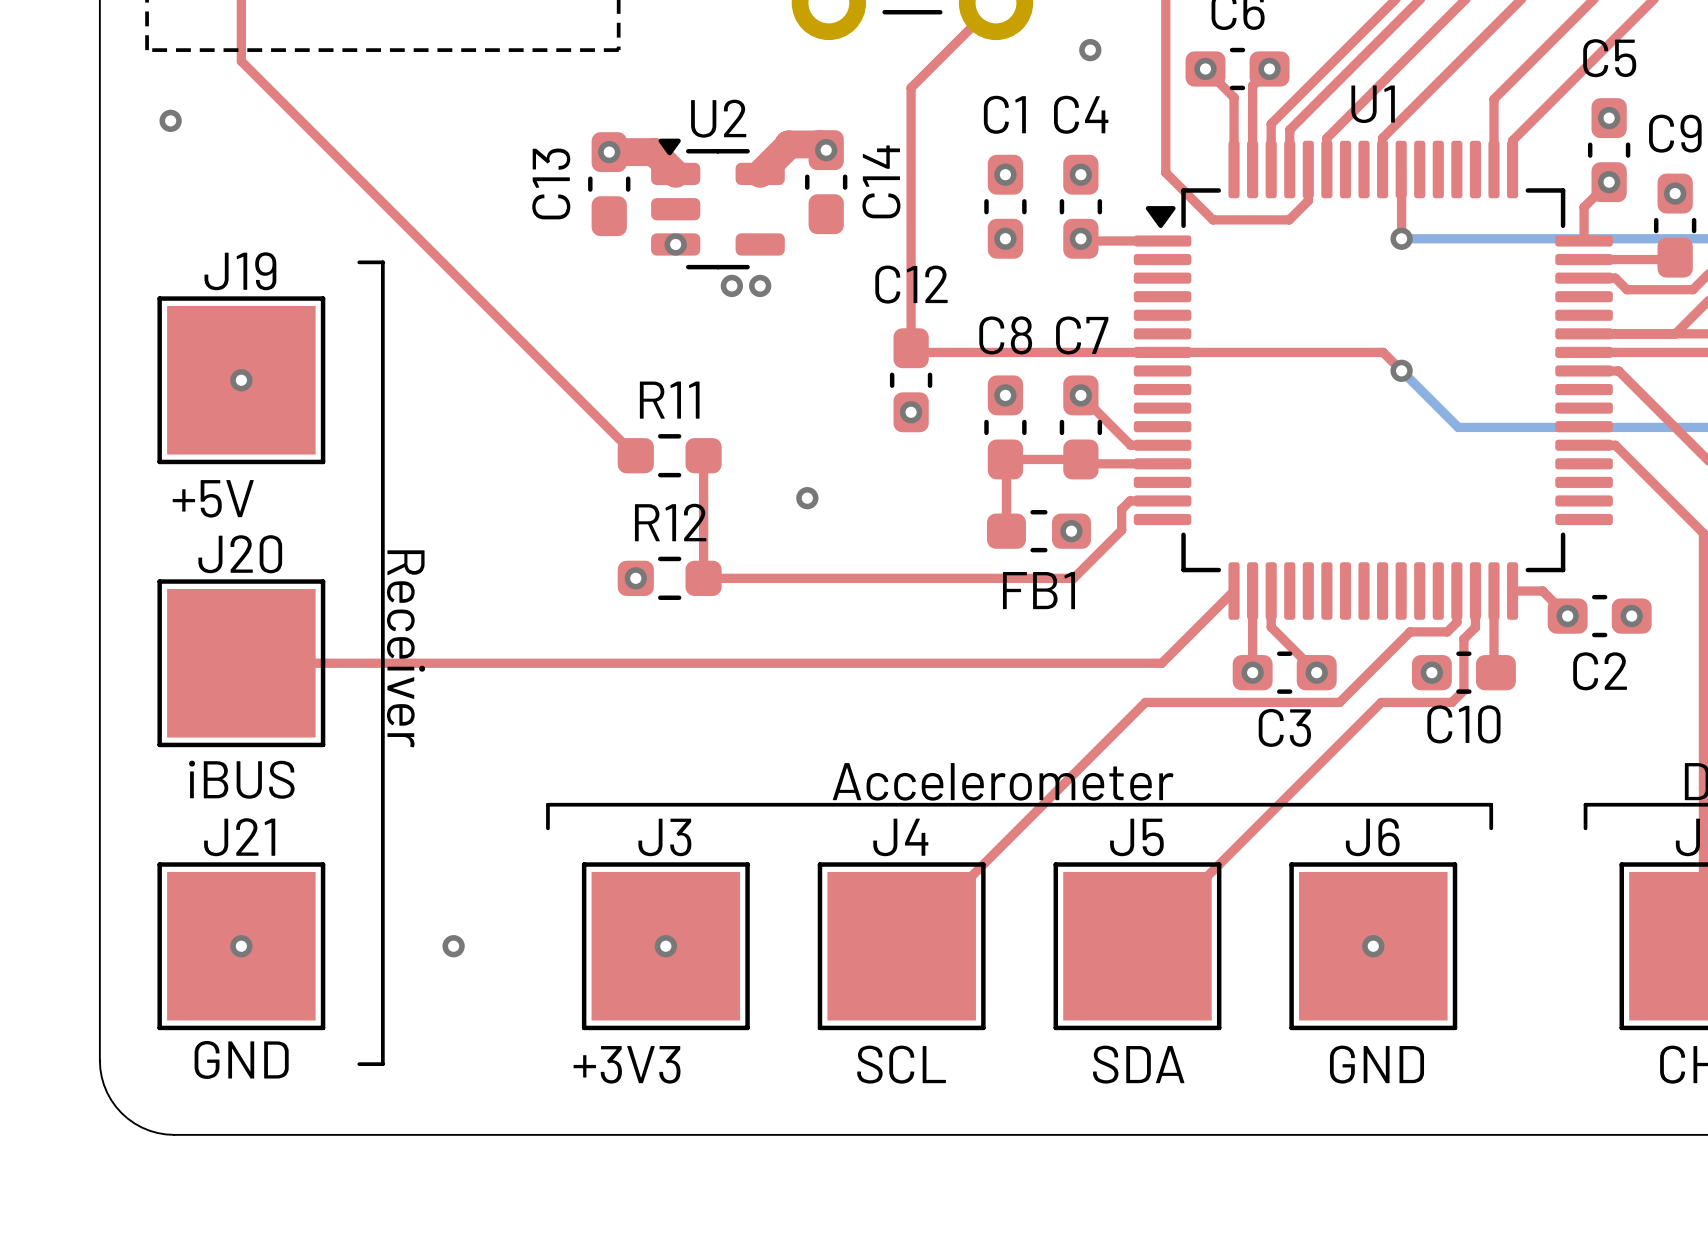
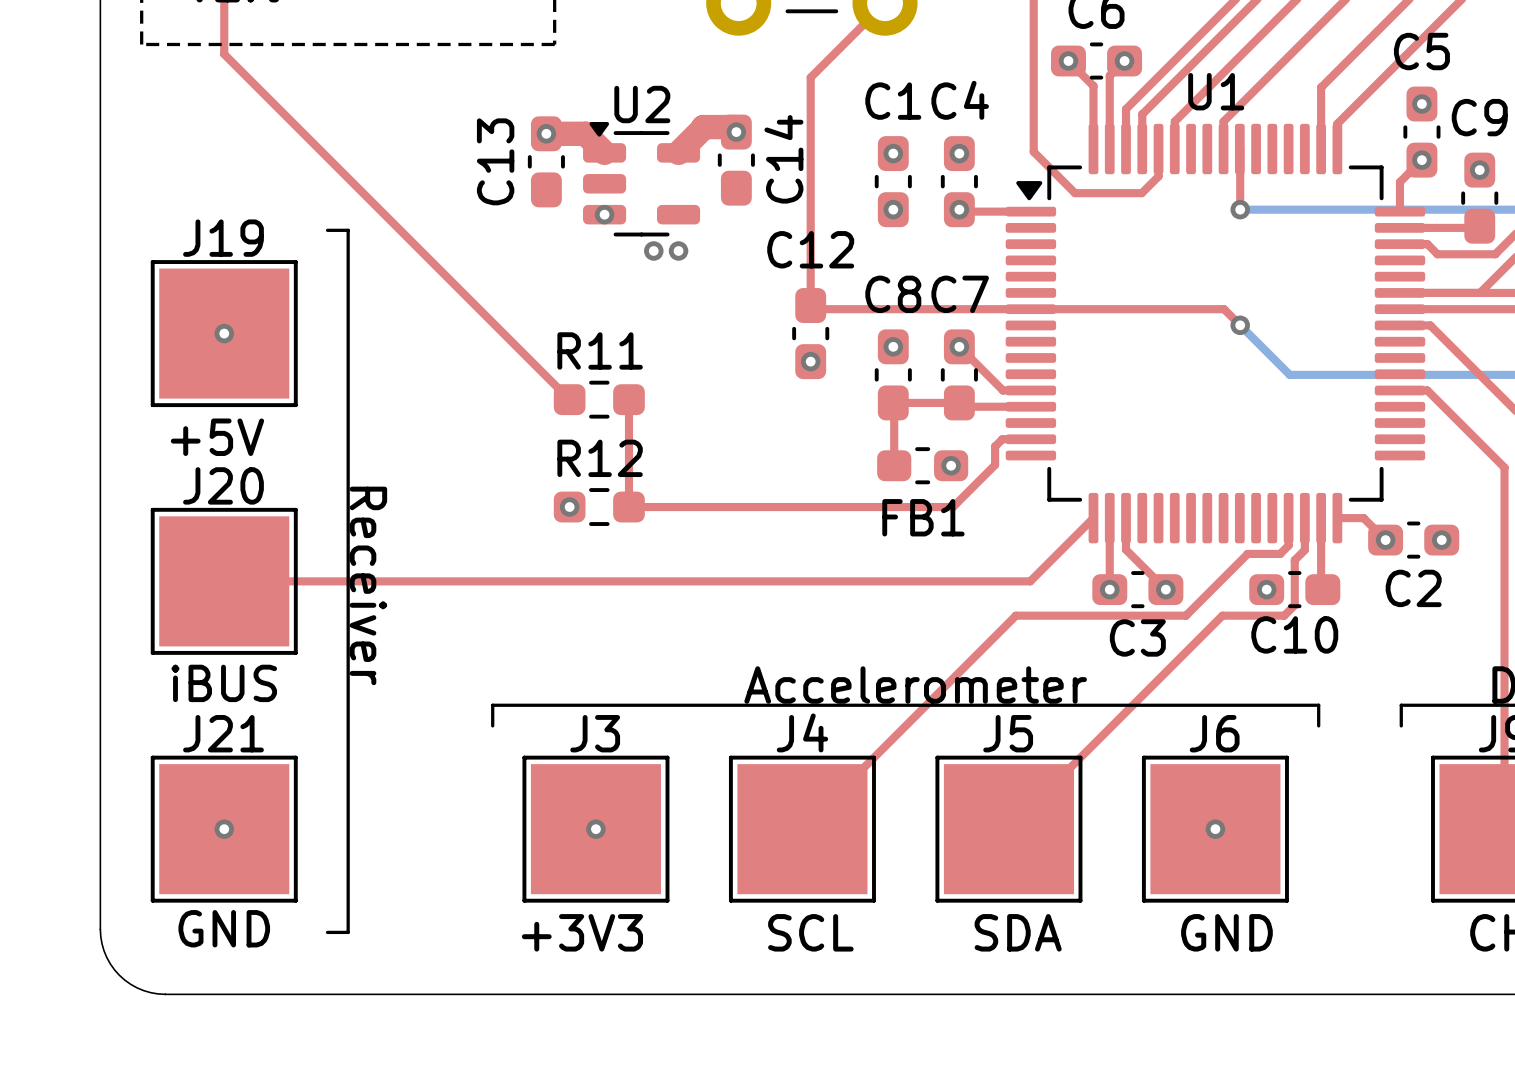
via: (1090, 50) -> none
via: (170, 120) -> none
via: (807, 498) -> none
via: (453, 946) -> none

